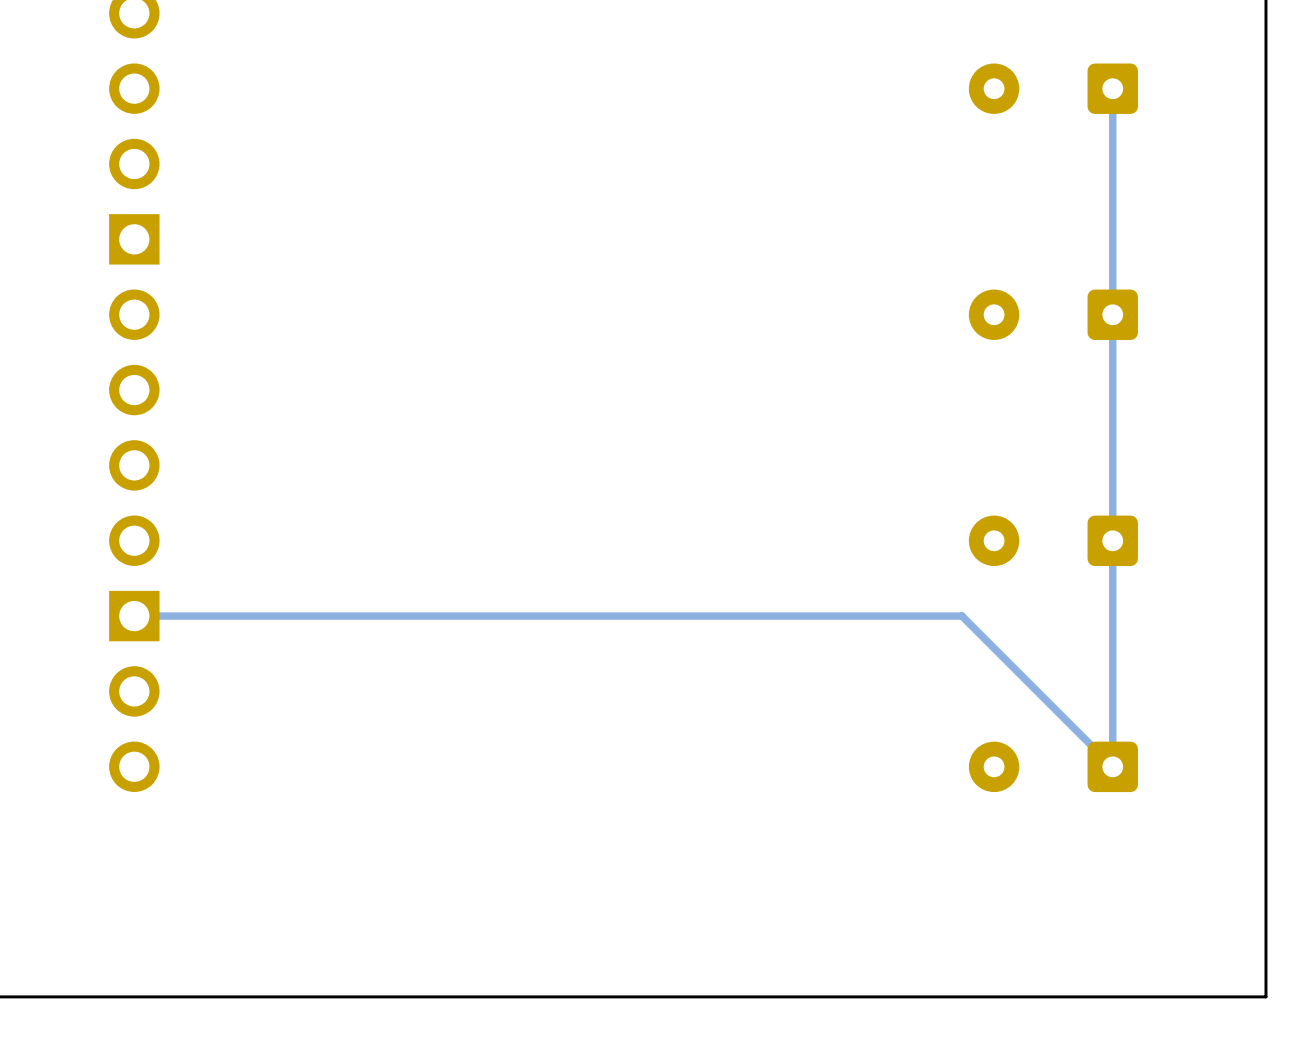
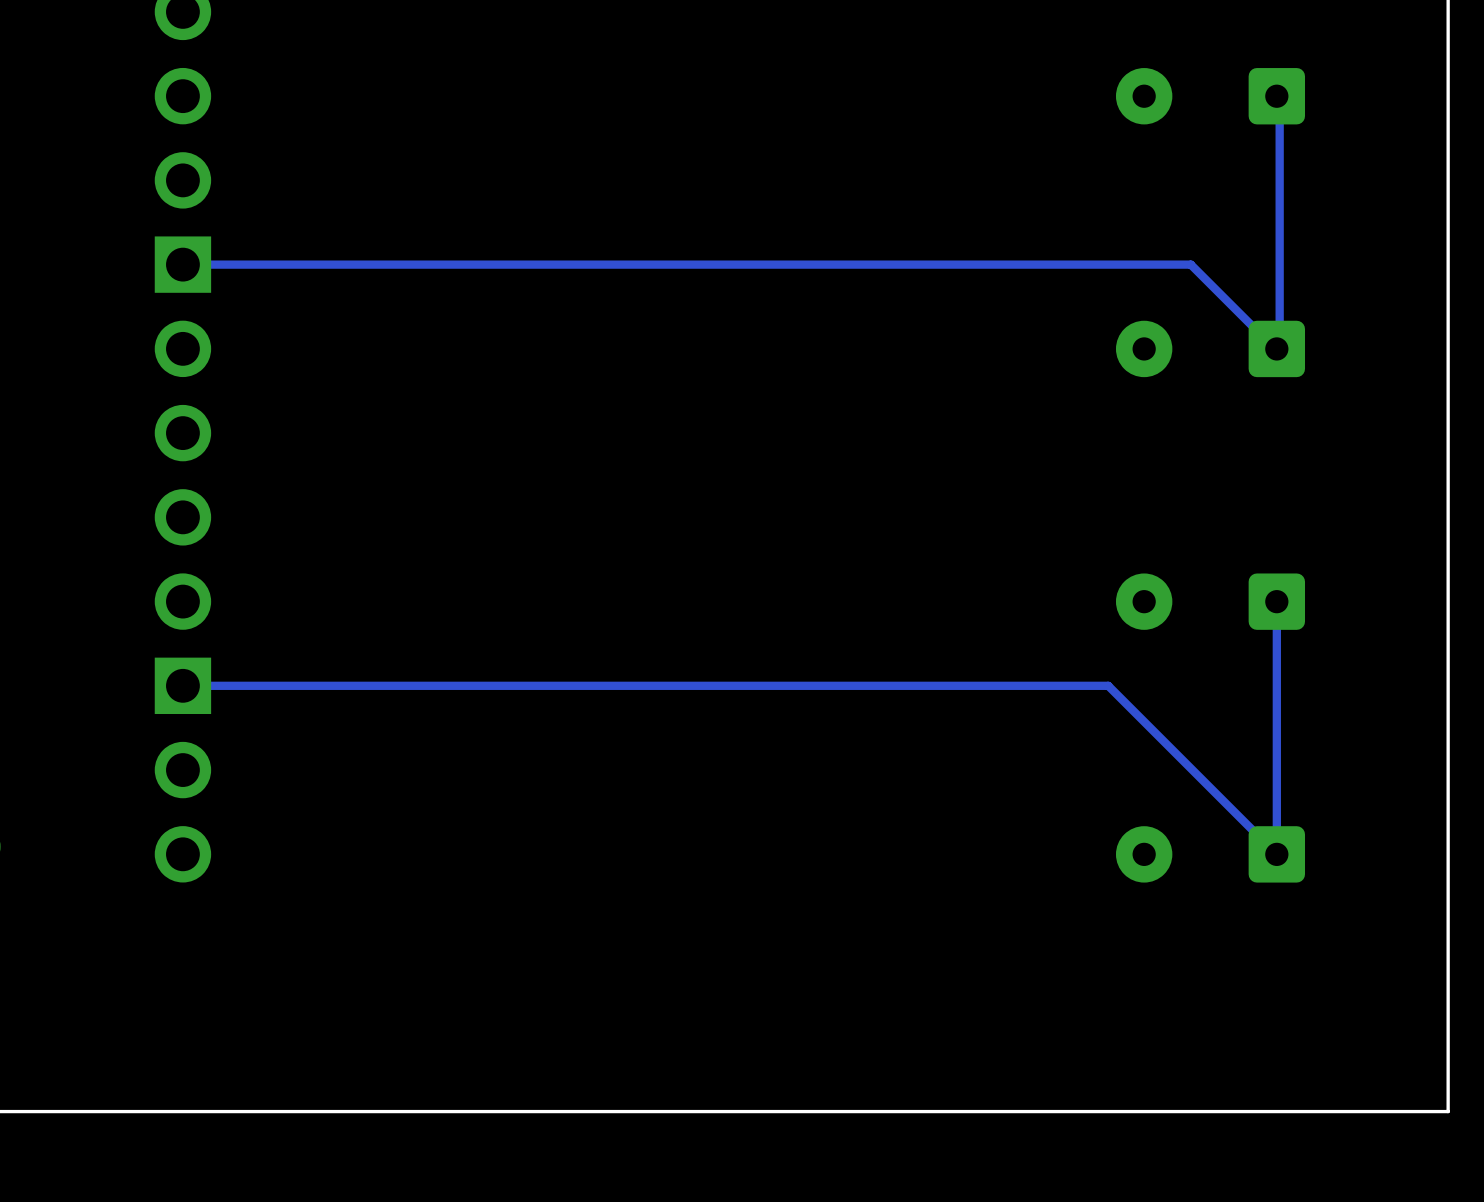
track: (1112, 88) (1112, 540) -> none
track: none -> (1279, 100) (1279, 346) (1276, 348) (1279, 353) (1190, 264) (182, 264)

